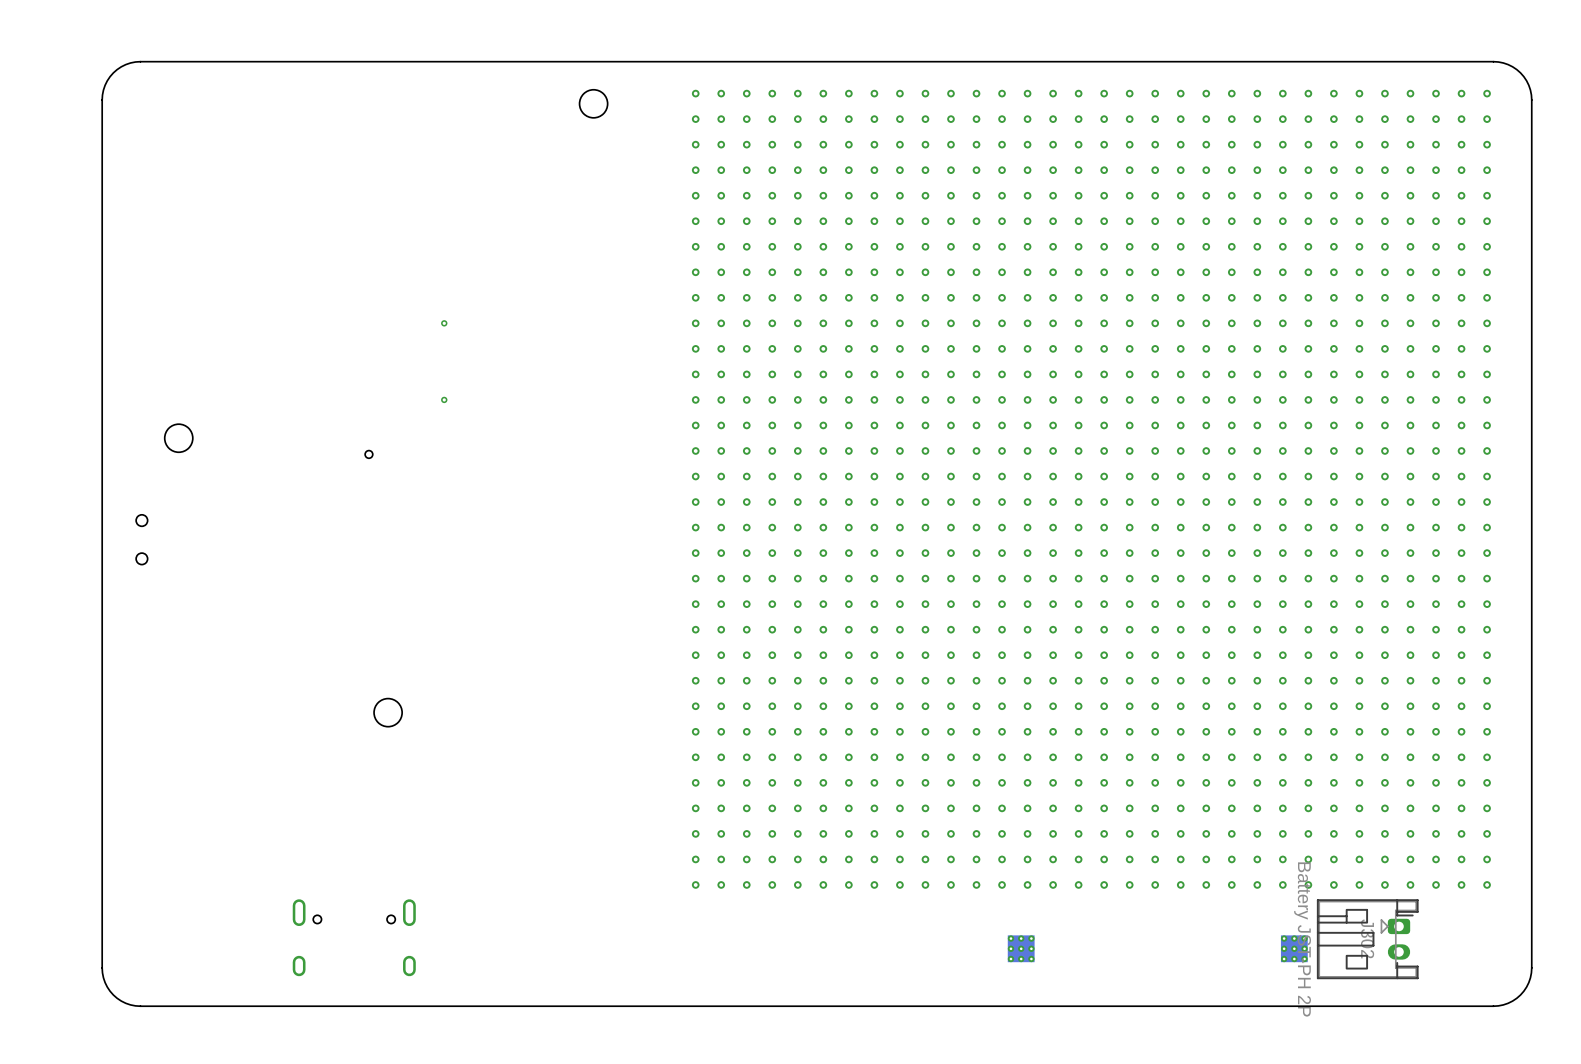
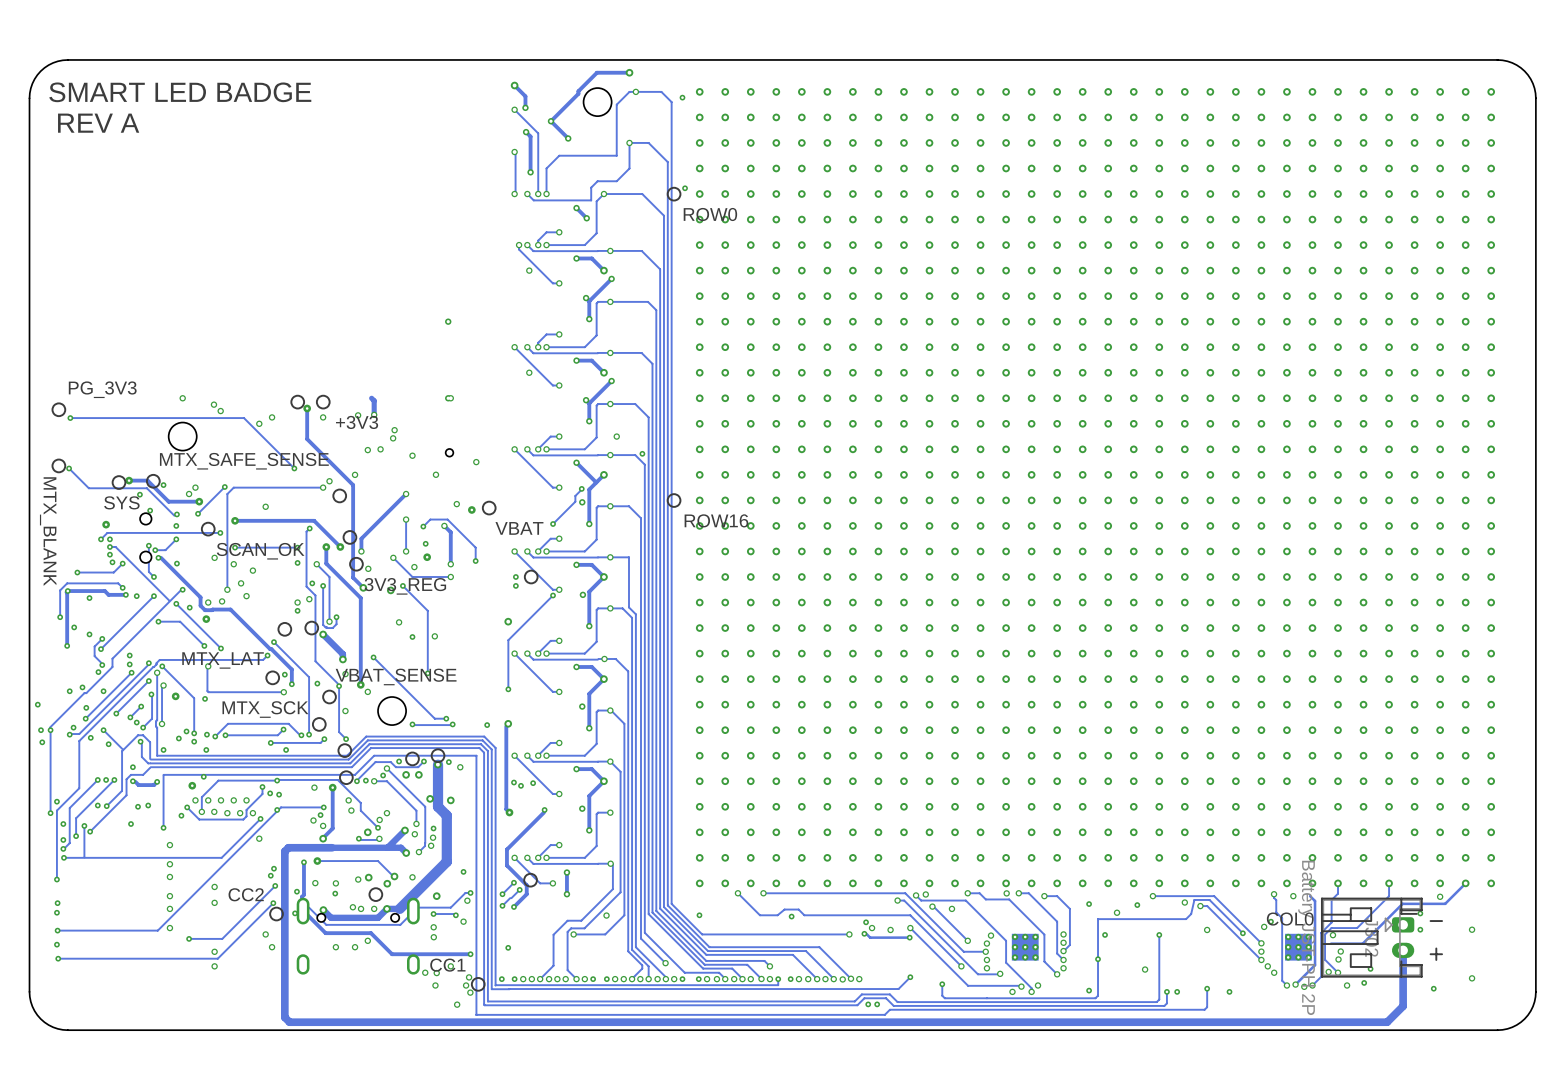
board edge: (140, 61) (125, 64) (113, 72) (105, 85) (102, 99) (102, 967) (107, 987) (121, 1001) (140, 1006) (1493, 1006) (1508, 1003) (1520, 995) (1528, 982) (1531, 967) -> (144, 59) (57, 61) (48, 65) (37, 74) (29, 93) (29, 991) (34, 1011) (48, 1025) (67, 1030) (1497, 1030) (1516, 1025) (1530, 1011) (1535, 996) (1535, 966)
track: none -> (629, 72) (596, 72) (578, 91) (578, 93) (550, 121) (568, 138)
via: none -> (629, 72)
track: none -> (514, 85) (525, 96) (525, 107)
via: none -> (514, 85)
via: none -> (635, 91)
text: none -> SMART LED BADGE (180, 92)
via: none -> (682, 97)
via: none -> (525, 107)
track: none -> (514, 109) (538, 133) (538, 194)
via: none -> (514, 109)
via: none -> (550, 121)
text: none -> REV A (98, 123)
track: none -> (526, 132) (530, 136) (530, 172)
via: none -> (526, 132)
via: none -> (568, 138)
via: none -> (629, 142)
via: none -> (514, 152)
track: none -> (515, 152) (515, 193)
via: none -> (530, 172)
drawing: none -> [666, 186, 682, 202]
via: none -> (685, 188)
via: none -> (514, 194)
track: none -> (527, 194) (533, 200) (591, 200) (591, 187) (597, 181) (616, 181) (629, 168) (629, 142) (648, 142) (667, 162) (667, 905) (709, 947) (819, 947) (851, 978)
via: none -> (527, 194)
via: none -> (538, 194)
track: none -> (546, 194) (546, 168) (559, 155) (616, 155) (616, 104) (629, 91) (661, 91) (671, 102) (671, 903) (702, 934) (849, 934)
via: none -> (546, 194)
via: none -> (603, 194)
track: none -> (576, 208) (586, 218)
via: none -> (576, 208)
text: none -> ROW0 (710, 214)
via: none -> (586, 218)
track: none -> (559, 232) (546, 232) (538, 240) (538, 245)
via: none -> (559, 232)
track: none -> (519, 245) (519, 249) (552, 283) (559, 283)
via: none -> (519, 245)
track: none -> (527, 245) (533, 251) (597, 251)
via: none -> (527, 245)
via: none -> (538, 245)
track: none -> (546, 245) (584, 245) (596, 233) (596, 201) (603, 194) (642, 194) (663, 215) (663, 907) (707, 951) (805, 951) (833, 978)
via: none -> (546, 245)
track: none -> (598, 250) (641, 250) (660, 269) (660, 908) (706, 954) (792, 954) (817, 979)
via: none -> (610, 250)
track: none -> (576, 258) (591, 258) (603, 270)
via: none -> (576, 258)
via: none -> (529, 270)
via: none -> (603, 270)
track: none -> (611, 278) (589, 301)
via: none -> (611, 278)
via: none -> (559, 283)
via: none -> (586, 298)
track: none -> (589, 301) (589, 319)
via: none -> (610, 301)
via: none -> (589, 319)
track: none -> (559, 334) (546, 334) (538, 342) (538, 347)
via: none -> (559, 334)
track: none -> (514, 347) (552, 385) (559, 385)
via: none -> (514, 347)
track: none -> (527, 347) (533, 353) (597, 353)
via: none -> (527, 347)
via: none -> (538, 347)
track: none -> (546, 347) (584, 347) (596, 335) (596, 303) (598, 301) (648, 301) (656, 310) (656, 910) (706, 960) (764, 960) (769, 966)
via: none -> (546, 347)
track: none -> (598, 352) (641, 352) (652, 363) (652, 912) (704, 964) (747, 964) (761, 978)
via: none -> (610, 352)
track: none -> (576, 360) (591, 360) (603, 372)
via: none -> (576, 360)
via: none -> (529, 372)
via: none -> (603, 372)
track: none -> (611, 381) (589, 403)
via: none -> (611, 381)
via: none -> (559, 385)
text: none -> PG_3V3 (102, 389)
drawing: none -> [290, 394, 331, 410]
via: none -> (182, 398)
track: none -> (371, 398) (374, 400) (374, 414)
via: none -> (450, 398)
via: none -> (586, 400)
drawing: none -> [51, 402, 67, 418]
track: none -> (589, 403) (589, 421)
via: none -> (610, 404)
via: none -> (213, 404)
track: none -> (307, 408) (307, 439) (353, 485) (353, 577) (360, 585)
via: none -> (307, 408)
via: none -> (220, 411)
via: none -> (374, 414)
via: none -> (358, 415)
track: none -> (70, 418) (243, 418) (294, 468)
via: none -> (70, 418)
via: none -> (272, 417)
via: none -> (323, 417)
via: none -> (589, 421)
text: none -> +3V3 (357, 422)
via: none -> (259, 423)
via: none -> (394, 430)
track: none -> (559, 436) (550, 436) (538, 449)
via: none -> (559, 436)
via: none -> (616, 436)
via: none -> (393, 438)
via: none -> (380, 449)
track: none -> (514, 449) (552, 487) (559, 487)
via: none -> (514, 449)
track: none -> (527, 449) (533, 455) (597, 455)
via: none -> (527, 449)
via: none -> (538, 449)
track: none -> (546, 449) (584, 449) (596, 437) (596, 405) (598, 404) (635, 404) (648, 417) (648, 914) (703, 968) (732, 968) (742, 978)
via: none -> (546, 449)
via: none -> (367, 450)
part position: (368, 454) -> (449, 452)
via: none -> (642, 453)
track: none -> (598, 455) (635, 455) (644, 464) (644, 932) (684, 972) (719, 972) (723, 976)
via: none -> (610, 455)
via: none -> (412, 455)
drawing: none -> [51, 458, 67, 474]
text: none -> MTX_SAFE_SENSE (244, 461)
via: none -> (476, 462)
track: none -> (576, 462) (596, 482)
via: none -> (576, 462)
track: none -> (69, 468) (88, 488) (146, 488) (174, 515)
via: none -> (69, 468)
via: none -> (294, 468)
drawing: none -> [146, 473, 161, 489]
drawing: none -> [111, 475, 127, 490]
via: none -> (355, 474)
via: none -> (435, 474)
track: none -> (603, 474) (589, 489) (589, 524)
via: none -> (603, 474)
track: none -> (129, 480) (147, 480) (168, 501) (199, 501)
via: none -> (129, 480)
via: none -> (329, 481)
via: none -> (163, 485)
track: none -> (224, 486) (198, 513)
via: none -> (224, 486)
via: none -> (195, 487)
track: none -> (323, 487) (233, 487) (227, 494) (227, 589)
via: none -> (323, 487)
via: none -> (559, 487)
drawing: none -> [332, 488, 348, 504]
via: none -> (581, 488)
track: none -> (581, 489) (575, 495) (575, 501) (553, 524)
drawing: none -> [666, 493, 682, 508]
via: none -> (189, 494)
track: none -> (406, 494) (361, 538) (361, 551)
via: none -> (406, 494)
via: none -> (139, 494)
drawing: none -> [481, 500, 497, 516]
via: none -> (199, 501)
via: none -> (582, 502)
text: none -> SYS (121, 502)
via: none -> (456, 504)
via: none -> (610, 506)
via: none -> (265, 506)
via: none -> (471, 509)
via: none -> (150, 510)
via: none -> (198, 513)
via: none -> (176, 514)
track: none -> (406, 519) (406, 551)
via: none -> (406, 519)
track: none -> (235, 520) (314, 520) (340, 546)
via: none -> (235, 520)
text: none -> ROW16 (716, 520)
drawing: none -> [200, 521, 216, 537]
via: none -> (553, 524)
via: none -> (589, 524)
via: none -> (106, 524)
via: none -> (176, 525)
track: none -> (444, 525) (450, 532) (450, 564)
via: none -> (444, 525)
track: none -> (423, 526) (430, 519) (447, 519) (475, 547) (475, 561)
via: none -> (423, 526)
track: none -> (309, 528) (306, 531) (306, 586) (315, 595) (315, 661) (337, 683)
via: none -> (309, 528)
text: none -> VBAT (519, 528)
drawing: none -> [342, 530, 364, 572]
text: none -> MTX_BLANK (48, 531)
track: none -> (220, 532) (107, 532) (101, 539)
via: none -> (220, 532)
via: none -> (101, 539)
via: none -> (109, 539)
track: none -> (176, 539) (165, 550) (155, 550)
via: none -> (176, 539)
track: none -> (559, 538) (550, 538) (538, 551)
via: none -> (559, 538)
via: none -> (425, 543)
track: none -> (148, 545) (148, 571) (153, 576)
via: none -> (148, 545)
track: none -> (109, 546) (115, 546) (169, 600)
via: none -> (109, 546)
track: none -> (326, 546) (326, 563) (360, 598) (360, 684)
via: none -> (326, 546)
via: none -> (340, 546)
via: none -> (235, 547)
track: none -> (297, 547) (235, 547)
via: none -> (297, 547)
via: none -> (155, 550)
text: none -> SCAN_OK (260, 551)
via: none -> (361, 551)
via: none -> (406, 551)
track: none -> (514, 551) (552, 589) (559, 589)
via: none -> (514, 551)
track: none -> (527, 551) (533, 557) (597, 557)
via: none -> (527, 551)
via: none -> (538, 551)
track: none -> (546, 551) (584, 551) (596, 539) (598, 506) (628, 506) (640, 518) (640, 938) (665, 963)
via: none -> (546, 551)
via: none -> (109, 554)
via: none -> (427, 557)
track: none -> (598, 557) (628, 557) (628, 607) (635, 614) (635, 947) (665, 979)
via: none -> (610, 557)
via: none -> (158, 557)
track: none -> (161, 557) (200, 597) (200, 605) (205, 610) (230, 609) (291, 669) (291, 684)
via: none -> (214, 557)
track: none -> (393, 557) (412, 576) (450, 576)
via: none -> (393, 557)
via: none -> (475, 561)
via: none -> (112, 562)
via: none -> (297, 562)
track: none -> (122, 563) (113, 572) (77, 572)
via: none -> (122, 563)
via: none -> (176, 563)
via: none -> (233, 564)
track: none -> (316, 564) (329, 576) (329, 621)
via: none -> (316, 564)
via: none -> (450, 564)
track: none -> (576, 564) (591, 564) (603, 576) (589, 591) (589, 626)
via: none -> (576, 564)
via: none -> (414, 567)
via: none -> (368, 568)
drawing: none -> [523, 569, 539, 585]
via: none -> (252, 570)
via: none -> (77, 572)
via: none -> (153, 576)
via: none -> (450, 576)
via: none -> (515, 576)
via: none -> (603, 576)
via: none -> (241, 583)
via: none -> (312, 583)
track: none -> (323, 585) (323, 624) (326, 628) (332, 628) (336, 624) (336, 617)
via: none -> (323, 585)
track: none -> (402, 585) (427, 610) (427, 673)
via: none -> (402, 585)
text: none -> 3V3_REG (405, 586)
via: none -> (515, 585)
track: none -> (122, 587) (118, 583) (67, 583) (60, 590) (60, 617)
via: none -> (122, 587)
via: none -> (363, 587)
track: none -> (182, 589) (112, 658) (112, 666) (49, 727)
via: none -> (182, 589)
via: none -> (227, 589)
via: none -> (559, 589)
track: none -> (67, 591) (104, 591) (108, 594) (123, 594)
via: none -> (67, 591)
via: none -> (390, 590)
track: none -> (66, 592) (67, 645)
via: none -> (125, 594)
via: none -> (582, 594)
via: none -> (136, 596)
track: none -> (153, 596) (101, 649)
via: none -> (153, 596)
via: none -> (246, 596)
track: none -> (553, 595) (508, 640) (508, 689)
via: none -> (553, 595)
via: none -> (89, 598)
via: none -> (309, 599)
via: none -> (222, 601)
via: none -> (208, 602)
via: none -> (297, 602)
track: none -> (176, 603) (221, 648)
via: none -> (176, 603)
via: none -> (189, 607)
via: none -> (610, 608)
via: none -> (297, 610)
via: none -> (60, 617)
via: none -> (336, 617)
via: none -> (206, 619)
drawing: none -> [277, 620, 320, 637]
track: none -> (158, 621) (180, 621) (204, 645)
via: none -> (158, 621)
via: none -> (329, 621)
via: none -> (508, 621)
via: none -> (399, 622)
via: none -> (589, 626)
via: none -> (74, 627)
via: none -> (89, 634)
track: none -> (323, 634) (342, 654) (342, 659)
via: none -> (323, 634)
via: none -> (434, 636)
via: none -> (412, 636)
track: none -> (102, 638) (94, 646) (94, 656) (101, 662)
via: none -> (102, 638)
track: none -> (559, 640) (550, 640) (538, 653)
via: none -> (559, 640)
track: none -> (273, 642) (309, 677) (309, 734)
via: none -> (273, 642)
via: none -> (67, 645)
via: none -> (204, 645)
via: none -> (101, 649)
via: none -> (221, 648)
track: none -> (514, 653) (552, 691) (559, 691)
via: none -> (514, 653)
track: none -> (527, 653) (533, 659) (597, 659)
via: none -> (527, 653)
via: none -> (538, 653)
track: none -> (546, 653) (584, 653) (596, 641) (598, 608) (622, 608) (632, 617) (632, 949) (648, 966) (648, 979)
via: none -> (546, 653)
via: none -> (129, 655)
track: none -> (267, 655) (263, 659) (159, 659) (79, 741) (79, 788) (56, 810) (56, 879)
via: none -> (267, 655)
track: none -> (373, 657) (434, 718) (446, 718)
via: none -> (373, 657)
track: none -> (598, 658) (615, 658) (628, 671) (628, 951) (642, 965) (642, 968) (634, 976)
via: none -> (604, 658)
via: none -> (342, 659)
text: none -> MTX_LAT (223, 660)
track: none -> (148, 663) (79, 734) (72, 734)
via: none -> (148, 663)
via: none -> (102, 665)
via: none -> (129, 664)
track: none -> (162, 666) (194, 698) (194, 733)
via: none -> (162, 666)
track: none -> (208, 666) (208, 692) (283, 692)
via: none -> (208, 666)
track: none -> (576, 666) (591, 666) (603, 679) (589, 693) (589, 728)
via: none -> (576, 666)
drawing: none -> [265, 670, 281, 686]
via: none -> (98, 672)
track: none -> (131, 672) (85, 718)
via: none -> (131, 672)
track: none -> (157, 672) (157, 755) (347, 755) (366, 736) (484, 736) (495, 747) (495, 985) (778, 985) (778, 979)
via: none -> (157, 672)
via: none -> (427, 673)
via: none -> (345, 674)
via: none -> (284, 674)
text: none -> VBAT_SENSE (396, 676)
via: none -> (603, 679)
track: none -> (148, 681) (116, 713)
via: none -> (148, 681)
via: none -> (291, 684)
via: none -> (317, 683)
via: none -> (360, 684)
track: none -> (163, 685) (162, 723)
via: none -> (163, 685)
track: none -> (339, 686) (339, 732) (346, 739)
via: none -> (339, 686)
via: none -> (82, 687)
via: none -> (508, 689)
drawing: none -> [311, 689, 337, 732]
via: none -> (69, 691)
via: none -> (103, 691)
via: none -> (283, 692)
via: none -> (367, 691)
via: none -> (559, 691)
track: none -> (151, 694) (152, 718) (143, 727)
via: none -> (151, 694)
via: none -> (175, 696)
via: none -> (205, 698)
via: none -> (37, 704)
track: none -> (141, 706) (130, 717)
via: none -> (141, 706)
via: none -> (582, 706)
via: none -> (86, 707)
text: none -> MTX_SCK (265, 709)
via: none -> (345, 711)
track: none -> (610, 710) (596, 711) (596, 743) (584, 755) (546, 755)
via: none -> (610, 710)
track: none -> (611, 710) (624, 723) (624, 915) (605, 934) (573, 934)
via: none -> (116, 713)
via: none -> (130, 717)
via: none -> (85, 718)
via: none -> (446, 718)
via: none -> (136, 722)
via: none -> (162, 723)
via: none -> (508, 723)
via: none -> (412, 724)
track: none -> (452, 724) (412, 724)
via: none -> (452, 724)
via: none -> (487, 725)
track: none -> (506, 726) (506, 809) (509, 812)
via: none -> (73, 727)
via: none -> (143, 727)
via: none -> (589, 728)
via: none -> (41, 730)
track: none -> (50, 730) (50, 813)
via: none -> (50, 730)
track: none -> (103, 730) (122, 749)
via: none -> (103, 730)
track: none -> (283, 729) (277, 735) (225, 735)
via: none -> (283, 729)
via: none -> (186, 731)
via: none -> (194, 733)
track: none -> (298, 734) (288, 723) (228, 723) (215, 736)
via: none -> (69, 734)
via: none -> (206, 734)
via: none -> (225, 735)
via: none -> (301, 735)
via: none -> (309, 734)
via: none -> (215, 736)
via: none -> (90, 737)
via: none -> (178, 738)
track: none -> (324, 739) (320, 742) (270, 742)
via: none -> (324, 739)
via: none -> (346, 739)
via: none -> (42, 742)
track: none -> (140, 741) (141, 756) (150, 763)
via: none -> (140, 741)
via: none -> (194, 741)
via: none -> (270, 742)
drawing: none -> [337, 743, 354, 786]
track: none -> (559, 742) (550, 742) (538, 755)
via: none -> (559, 742)
via: none -> (108, 744)
drawing: none -> [405, 748, 446, 767]
via: none -> (163, 749)
via: none -> (206, 749)
via: none -> (286, 749)
track: none -> (476, 755) (374, 755) (355, 774) (163, 774)
track: none -> (476, 755) (476, 1014)
track: none -> (514, 755) (552, 794) (559, 794)
via: none -> (514, 755)
track: none -> (527, 755) (533, 761) (597, 761)
via: none -> (527, 755)
via: none -> (538, 755)
via: none -> (546, 755)
track: none -> (150, 758) (150, 742) (143, 735) (138, 735) (122, 751) (122, 790) (106, 806)
track: none -> (150, 759) (348, 759) (367, 740) (482, 740) (491, 749) (491, 989) (898, 989) (910, 977)
via: none -> (399, 761)
track: none -> (423, 761) (418, 767) (395, 767) (390, 762) (375, 762) (356, 781)
via: none -> (423, 761)
via: none -> (448, 762)
track: none -> (598, 761) (610, 761) (620, 771) (620, 892) (584, 928) (571, 928) (567, 931) (567, 970) (576, 979)
via: none -> (610, 761)
track: none -> (150, 763) (350, 763) (369, 744) (481, 744) (487, 751) (487, 1001) (854, 1001) (861, 994) (889, 994) (897, 1002) (1156, 1002) (1159, 999) (1159, 934)
via: none -> (437, 764)
track: none -> (438, 764) (438, 806) (446, 815) (446, 861) (399, 908) (386, 908) (378, 917) (331, 917) (323, 910)
via: none -> (132, 767)
track: none -> (150, 767) (351, 767) (371, 748) (479, 748) (484, 752) (484, 1005) (857, 1005) (864, 998) (886, 998) (893, 1005) (1164, 1005) (1166, 1003) (1166, 991)
via: none -> (460, 767)
track: none -> (150, 767) (143, 774) (131, 774) (126, 779) (126, 795) (90, 831)
track: none -> (386, 768) (425, 806) (425, 845) (418, 852)
via: none -> (386, 768)
track: none -> (576, 769) (591, 769) (603, 781) (589, 795) (589, 830)
via: none -> (576, 769)
via: none -> (406, 774)
via: none -> (418, 774)
track: none -> (163, 775) (163, 827)
via: none -> (383, 775)
via: none -> (203, 776)
track: none -> (97, 779) (69, 808) (69, 843) (63, 848)
via: none -> (97, 779)
via: none -> (106, 779)
track: none -> (114, 779) (76, 818) (76, 836)
via: none -> (114, 779)
track: none -> (279, 779) (337, 779) (360, 802) (360, 810) (378, 827)
via: none -> (132, 781)
track: none -> (277, 780) (218, 780) (201, 797) (201, 808)
via: none -> (277, 780)
via: none -> (356, 781)
via: none -> (365, 780)
track: none -> (374, 781) (386, 781) (416, 810) (416, 823)
via: none -> (374, 781)
via: none -> (603, 781)
track: none -> (157, 781) (153, 785) (138, 785) (135, 781)
via: none -> (157, 781)
via: none -> (513, 782)
via: none -> (533, 783)
via: none -> (192, 785)
via: none -> (520, 785)
track: none -> (262, 786) (262, 794) (246, 809) (246, 816) (243, 819) (199, 819) (187, 807)
via: none -> (262, 786)
via: none -> (314, 787)
track: none -> (332, 787) (332, 828) (325, 836)
via: none -> (332, 787)
via: none -> (270, 793)
via: none -> (559, 794)
via: none -> (279, 794)
via: none -> (430, 798)
via: none -> (195, 800)
via: none -> (208, 800)
via: none -> (221, 800)
via: none -> (233, 800)
via: none -> (246, 800)
via: none -> (348, 800)
via: none -> (450, 800)
via: none -> (56, 801)
via: none -> (97, 805)
via: none -> (106, 806)
via: none -> (148, 805)
via: none -> (138, 806)
via: none -> (187, 807)
track: none -> (323, 807) (281, 807) (157, 930) (57, 930)
via: none -> (323, 807)
via: none -> (582, 808)
via: none -> (277, 809)
via: none -> (544, 809)
via: none -> (351, 810)
via: none -> (201, 811)
via: none -> (214, 811)
via: none -> (50, 813)
via: none -> (227, 813)
via: none -> (240, 813)
via: none -> (252, 813)
via: none -> (386, 813)
via: none -> (509, 812)
track: none -> (543, 812) (506, 849) (506, 865) (526, 885) (526, 894) (515, 905)
track: none -> (610, 812) (596, 814) (596, 846) (584, 857) (546, 857)
via: none -> (610, 812)
via: none -> (320, 815)
via: none -> (181, 815)
track: none -> (260, 818) (221, 857) (63, 857)
via: none -> (260, 818)
via: none -> (379, 819)
via: none -> (313, 820)
via: none -> (63, 824)
via: none -> (131, 824)
via: none -> (416, 823)
track: none -> (84, 825) (84, 857)
via: none -> (84, 825)
via: none -> (323, 825)
via: none -> (163, 827)
via: none -> (378, 827)
via: none -> (433, 828)
via: none -> (589, 830)
track: none -> (405, 830) (387, 847)
via: none -> (405, 830)
via: none -> (90, 831)
via: none -> (367, 832)
via: none -> (414, 834)
via: none -> (76, 836)
via: none -> (433, 837)
via: none -> (259, 838)
via: none -> (323, 838)
track: none -> (358, 838) (376, 839)
via: none -> (358, 838)
via: none -> (379, 838)
via: none -> (63, 839)
via: none -> (169, 845)
track: none -> (559, 845) (550, 845) (538, 857)
via: none -> (559, 845)
via: none -> (431, 845)
via: none -> (63, 848)
via: none -> (418, 852)
track: none -> (406, 853) (401, 847) (288, 847) (284, 851) (284, 1017) (289, 1022) (1387, 1022) (1403, 1006) (1403, 950)
via: none -> (406, 853)
via: none -> (63, 857)
track: none -> (514, 857) (540, 883) (552, 883)
via: none -> (514, 857)
track: none -> (527, 857) (533, 863) (597, 863)
via: none -> (527, 857)
via: none -> (538, 857)
via: none -> (546, 857)
track: none -> (317, 861) (378, 861) (392, 875)
via: none -> (317, 861)
track: none -> (303, 862) (302, 910) (325, 933) (371, 933) (392, 954) (470, 954)
via: none -> (303, 862)
via: none -> (169, 864)
track: none -> (610, 863) (598, 863)
via: none -> (610, 863)
track: none -> (612, 864) (612, 889) (581, 920) (567, 920) (553, 934) (553, 965) (540, 979)
via: none -> (273, 868)
via: none -> (463, 871)
drawing: none -> [523, 872, 538, 888]
track: none -> (566, 872) (566, 894)
via: none -> (566, 872)
via: none -> (270, 875)
via: none -> (169, 876)
via: none -> (394, 876)
via: none -> (412, 877)
via: none -> (368, 877)
via: none -> (56, 879)
via: none -> (358, 879)
via: none -> (315, 883)
via: none -> (335, 883)
track: none -> (513, 882) (502, 894)
via: none -> (513, 882)
via: none -> (552, 883)
track: none -> (1338, 883) (1338, 893) (1331, 900) (1331, 922) (1321, 932) (1321, 976) (1312, 985)
track: none -> (1389, 883) (1389, 896) (1357, 928) (1331, 928) (1325, 934) (1325, 959) (1338, 972)
track: none -> (1465, 883) (1445, 903) (1402, 903) (1362, 943) (1331, 943)
via: none -> (387, 883)
track: none -> (275, 885) (222, 938) (189, 938)
via: none -> (275, 885)
via: none -> (214, 886)
drawing: none -> [368, 887, 384, 902]
track: none -> (519, 889) (511, 898)
via: none -> (519, 889)
via: none -> (296, 891)
track: none -> (470, 892) (465, 892) (450, 907) (417, 907) (400, 924) (326, 924) (309, 907)
via: none -> (470, 892)
track: none -> (737, 893) (759, 915) (777, 915) (784, 909) (798, 909) (804, 915) (910, 915) (961, 966)
via: none -> (737, 893)
track: none -> (763, 893) (905, 893) (963, 951) (985, 951)
via: none -> (763, 893)
track: none -> (967, 893) (979, 893) (985, 899) (1009, 899) (1044, 934) (1044, 961) (1057, 974)
via: none -> (967, 893)
via: none -> (1006, 893)
track: none -> (1018, 893) (1028, 893) (1057, 921) (1057, 953) (1063, 959)
via: none -> (1018, 893)
via: none -> (335, 893)
via: none -> (502, 894)
via: none -> (566, 894)
track: none -> (1274, 894) (1276, 912) (1282, 918) (1282, 980) (1286, 985)
via: none -> (1274, 894)
text: none -> CC2 (246, 894)
via: none -> (925, 894)
via: none -> (169, 896)
via: none -> (436, 896)
track: none -> (916, 895) (921, 900) (965, 900) (1006, 940) (1006, 962) (1031, 988) (1031, 991)
via: none -> (916, 895)
track: none -> (1044, 896) (1057, 896) (1069, 908) (1069, 944) (1063, 951)
via: none -> (1044, 896)
track: none -> (1152, 896) (1214, 896) (1261, 943)
via: none -> (1152, 896)
via: none -> (1293, 896)
track: none -> (1310, 896) (1315, 901) (1315, 965) (1295, 984)
via: none -> (1440, 896)
track: none -> (510, 898) (502, 905)
via: none -> (467, 900)
track: none -> (897, 900) (904, 900) (977, 974) (999, 974)
via: none -> (897, 900)
via: none -> (57, 903)
via: none -> (214, 902)
track: none -> (273, 903) (217, 958) (58, 958)
via: none -> (273, 903)
via: none -> (1184, 902)
via: none -> (1089, 904)
via: none -> (1137, 905)
via: none -> (502, 905)
track: none -> (1200, 906) (1207, 906) (1261, 959)
via: none -> (1200, 906)
drawing: none -> [269, 906, 284, 922]
via: none -> (352, 907)
via: none -> (513, 906)
via: none -> (932, 906)
track: none -> (933, 906) (967, 940)
via: none -> (169, 908)
via: none -> (361, 908)
via: none -> (374, 908)
via: none -> (386, 908)
via: none -> (951, 908)
via: none -> (323, 910)
via: none -> (56, 912)
via: none -> (295, 913)
via: none -> (1117, 912)
track: none -> (433, 914) (455, 915)
via: none -> (433, 914)
via: none -> (1420, 913)
via: none -> (455, 915)
via: none -> (699, 915)
via: none -> (606, 915)
via: none -> (791, 916)
text: none -> COL0 (1290, 919)
line: none -> (1442, 921) (1430, 921)
via: none -> (463, 921)
via: none -> (866, 922)
via: none -> (1270, 921)
via: none -> (433, 927)
via: none -> (1264, 926)
via: none -> (169, 928)
via: none -> (872, 928)
track: none -> (910, 928) (968, 985) (1020, 985)
via: none -> (910, 928)
via: none -> (890, 929)
via: none -> (1207, 929)
via: none -> (1420, 929)
via: none -> (1472, 929)
via: none -> (57, 930)
track: none -> (1242, 933) (1209, 899) (1194, 899) (1191, 914) (1186, 919) (1098, 919) (1098, 995) (1095, 998) (944, 998) (942, 995) (942, 984)
via: none -> (1242, 933)
via: none -> (864, 933)
track: none -> (866, 933) (870, 937) (909, 937)
via: none -> (265, 934)
via: none -> (573, 934)
via: none -> (849, 934)
via: none -> (1063, 934)
via: none -> (1105, 934)
via: none -> (1159, 934)
via: none -> (1332, 935)
via: none -> (991, 935)
via: none -> (433, 937)
via: none -> (909, 937)
via: none -> (189, 938)
via: none -> (367, 940)
via: none -> (967, 940)
via: none -> (1063, 942)
via: none -> (1261, 943)
via: none -> (986, 943)
via: none -> (56, 944)
via: none -> (272, 947)
via: none -> (335, 947)
via: none -> (355, 947)
via: none -> (508, 947)
line: none -> (1436, 948) (1436, 959)
via: none -> (1063, 951)
via: none -> (214, 951)
via: none -> (985, 951)
via: none -> (1261, 951)
via: none -> (1340, 951)
via: none -> (470, 954)
line: none -> (1442, 954) (1430, 954)
via: none -> (58, 958)
via: none -> (1098, 959)
via: none -> (986, 959)
via: none -> (1063, 959)
via: none -> (1261, 959)
via: none -> (1338, 959)
via: none -> (665, 963)
text: none -> CC1 (447, 965)
via: none -> (214, 966)
via: none -> (450, 966)
via: none -> (769, 966)
via: none -> (961, 966)
via: none -> (1267, 966)
via: none -> (986, 968)
via: none -> (1063, 968)
via: none -> (1370, 968)
via: none -> (1145, 969)
via: none -> (1328, 971)
via: none -> (425, 972)
via: none -> (436, 973)
via: none -> (1274, 972)
via: none -> (1338, 972)
via: none -> (1000, 973)
via: none -> (1057, 974)
via: none -> (469, 977)
drawing: none -> [470, 977, 486, 992]
via: none -> (910, 977)
via: none -> (1472, 978)
via: none -> (501, 979)
via: none -> (514, 979)
via: none -> (523, 979)
via: none -> (531, 979)
via: none -> (540, 979)
via: none -> (549, 979)
via: none -> (557, 979)
via: none -> (565, 979)
via: none -> (576, 979)
via: none -> (584, 979)
via: none -> (593, 979)
via: none -> (606, 979)
via: none -> (615, 979)
via: none -> (623, 979)
via: none -> (632, 979)
via: none -> (640, 979)
via: none -> (648, 979)
via: none -> (657, 979)
via: none -> (665, 979)
via: none -> (674, 979)
via: none -> (682, 979)
via: none -> (698, 979)
via: none -> (707, 979)
via: none -> (716, 979)
via: none -> (725, 979)
via: none -> (734, 979)
via: none -> (742, 979)
via: none -> (750, 979)
via: none -> (761, 978)
via: none -> (769, 979)
via: none -> (778, 979)
via: none -> (790, 979)
via: none -> (798, 979)
via: none -> (808, 979)
via: none -> (817, 979)
via: none -> (825, 979)
via: none -> (833, 979)
via: none -> (851, 978)
via: none -> (859, 979)
via: none -> (842, 979)
via: none -> (1364, 982)
via: none -> (942, 984)
via: none -> (1295, 984)
via: none -> (435, 985)
via: none -> (466, 985)
via: none -> (1038, 985)
via: none -> (1286, 985)
via: none -> (1312, 985)
via: none -> (1347, 985)
via: none -> (1021, 986)
via: none -> (1304, 986)
track: none -> (1207, 988) (1207, 1007) (1204, 1009) (889, 1009) (884, 1014) (476, 1014)
via: none -> (1207, 988)
via: none -> (1433, 988)
via: none -> (1089, 990)
via: none -> (1012, 991)
via: none -> (1031, 991)
via: none -> (1166, 991)
via: none -> (1177, 991)
via: none -> (1229, 991)
via: none -> (470, 992)
via: none -> (868, 1004)
via: none -> (877, 1004)
via: none -> (457, 1004)

